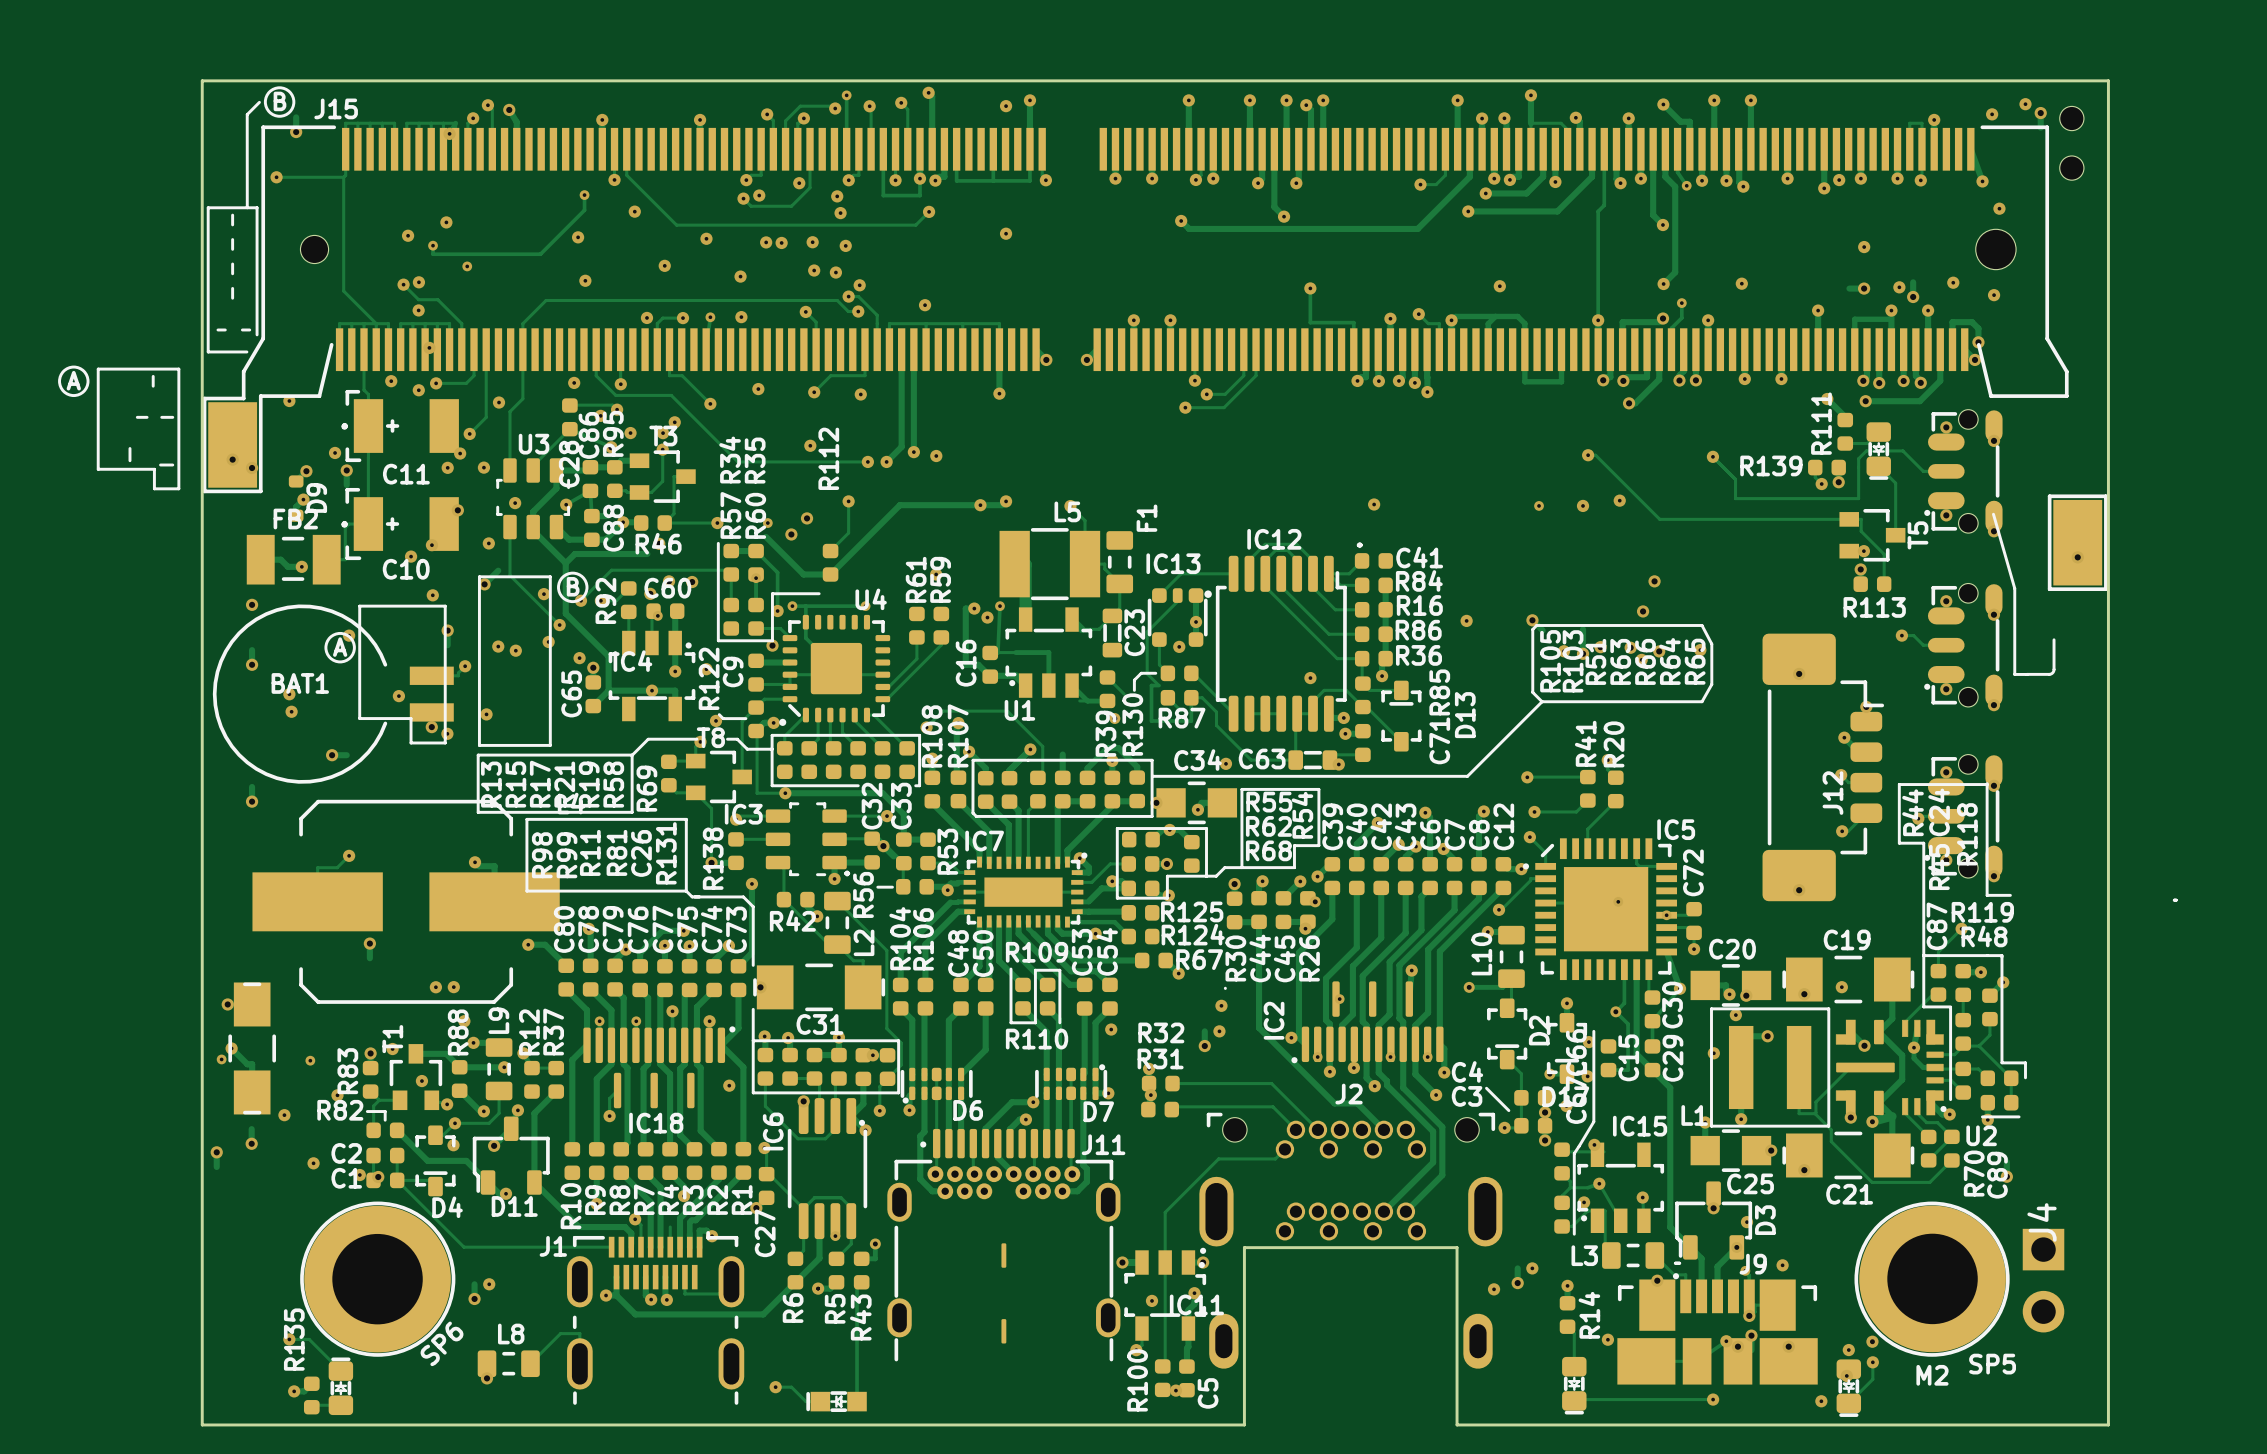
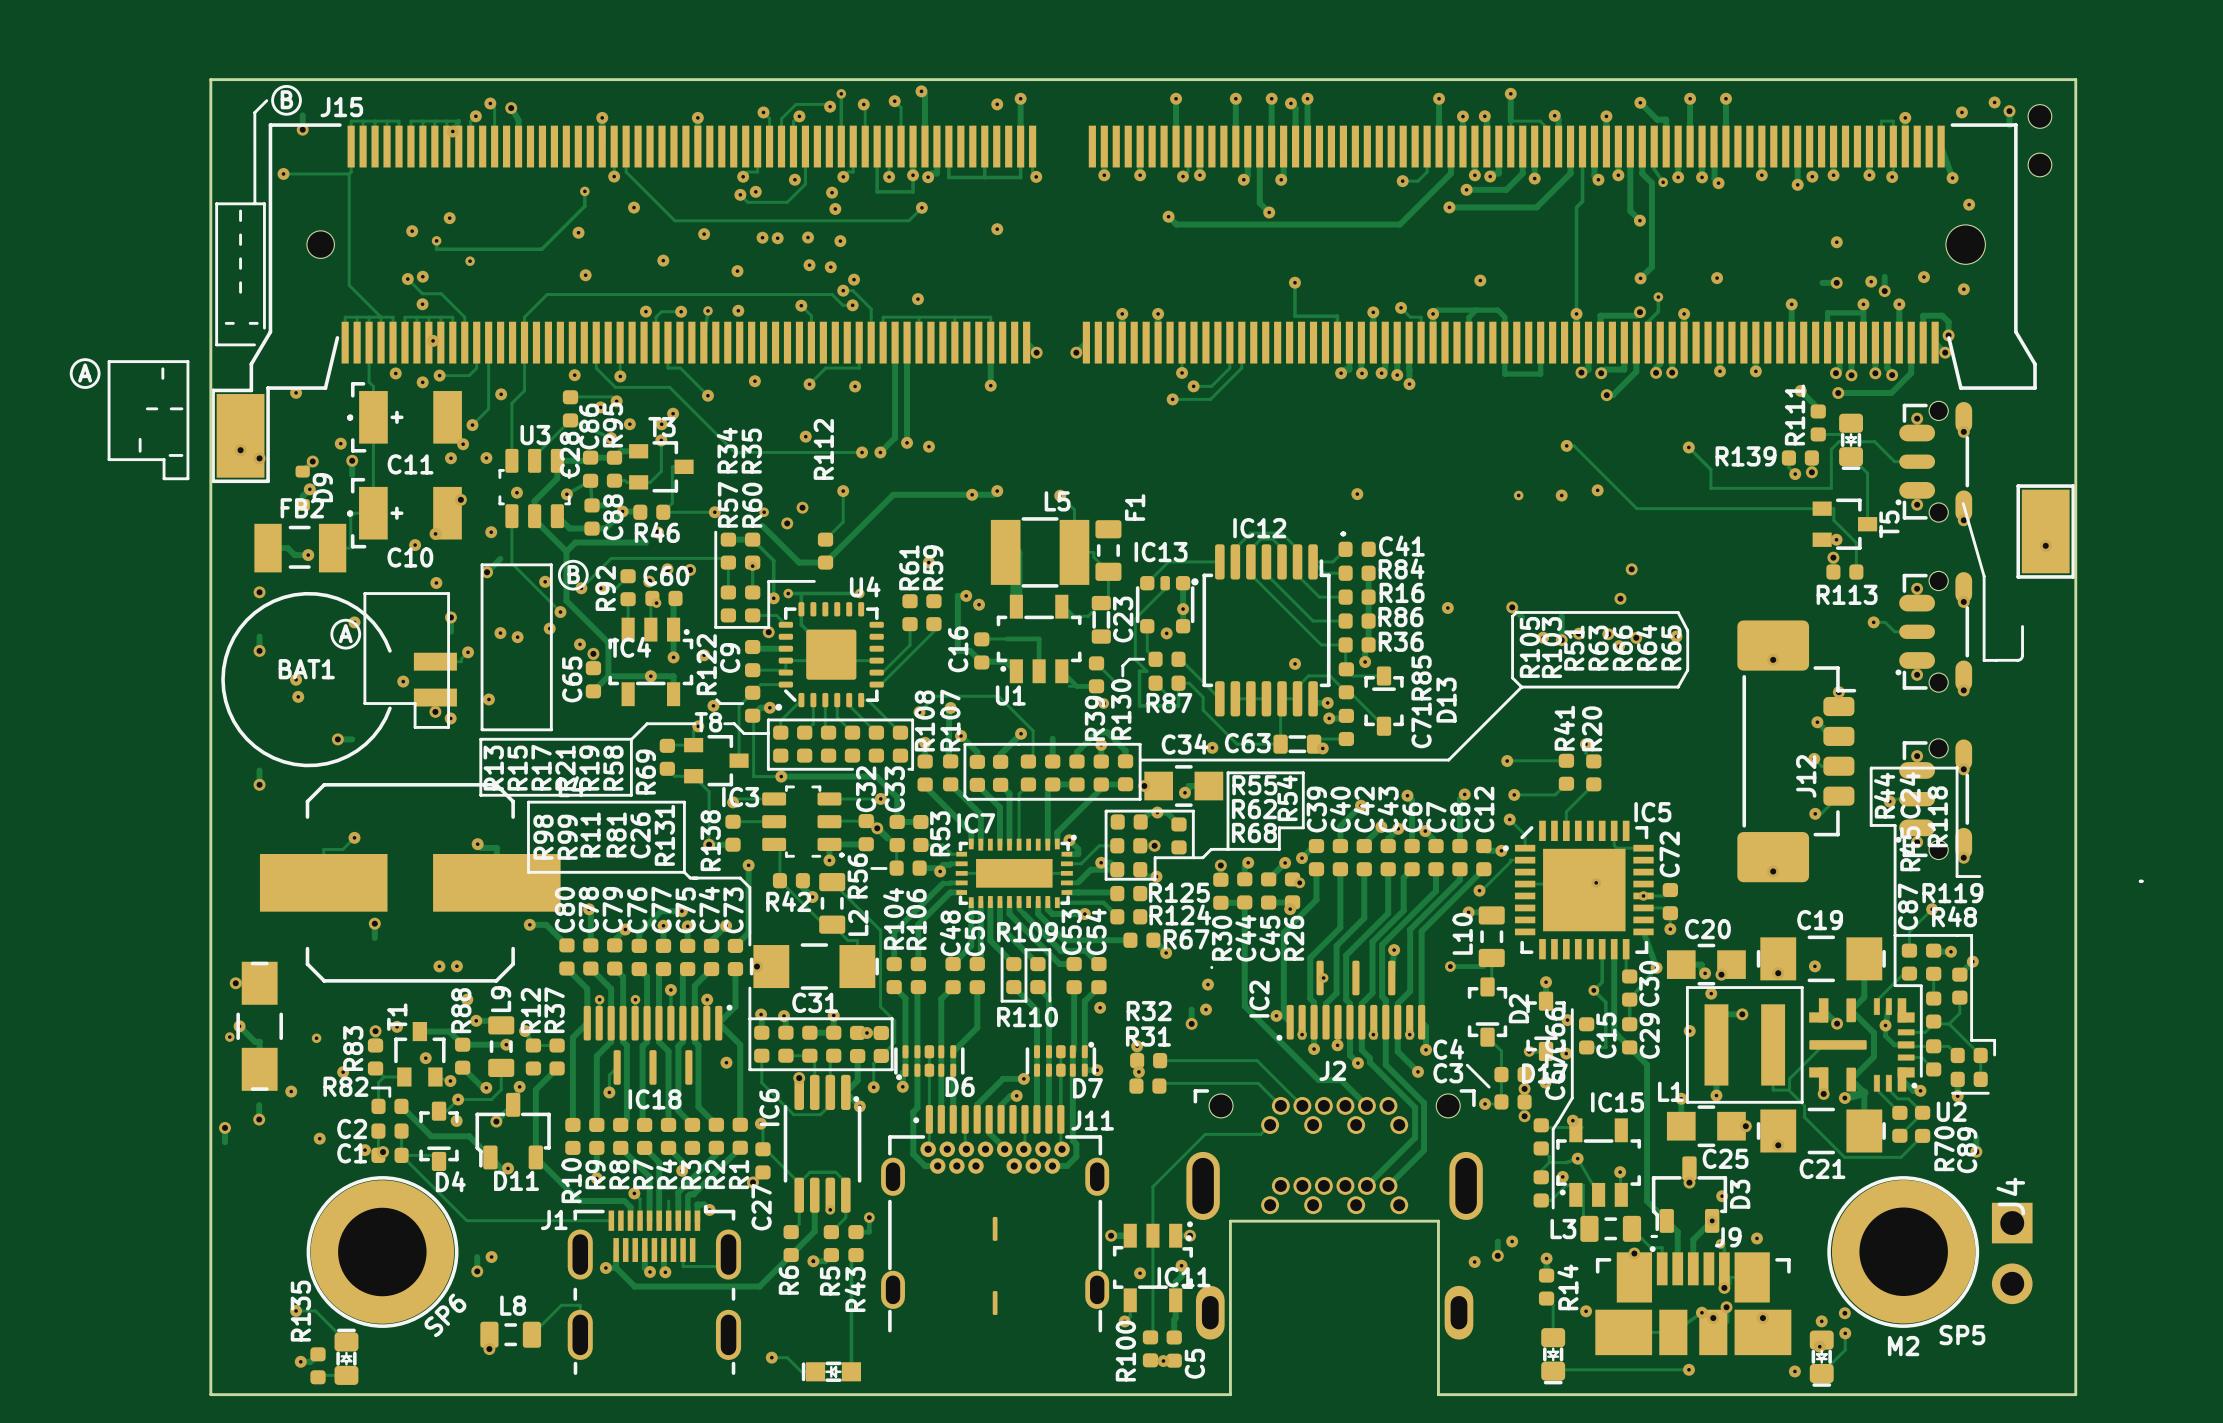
track: (999, 606) (997, 653) -> none
via: (999, 606) -> none

